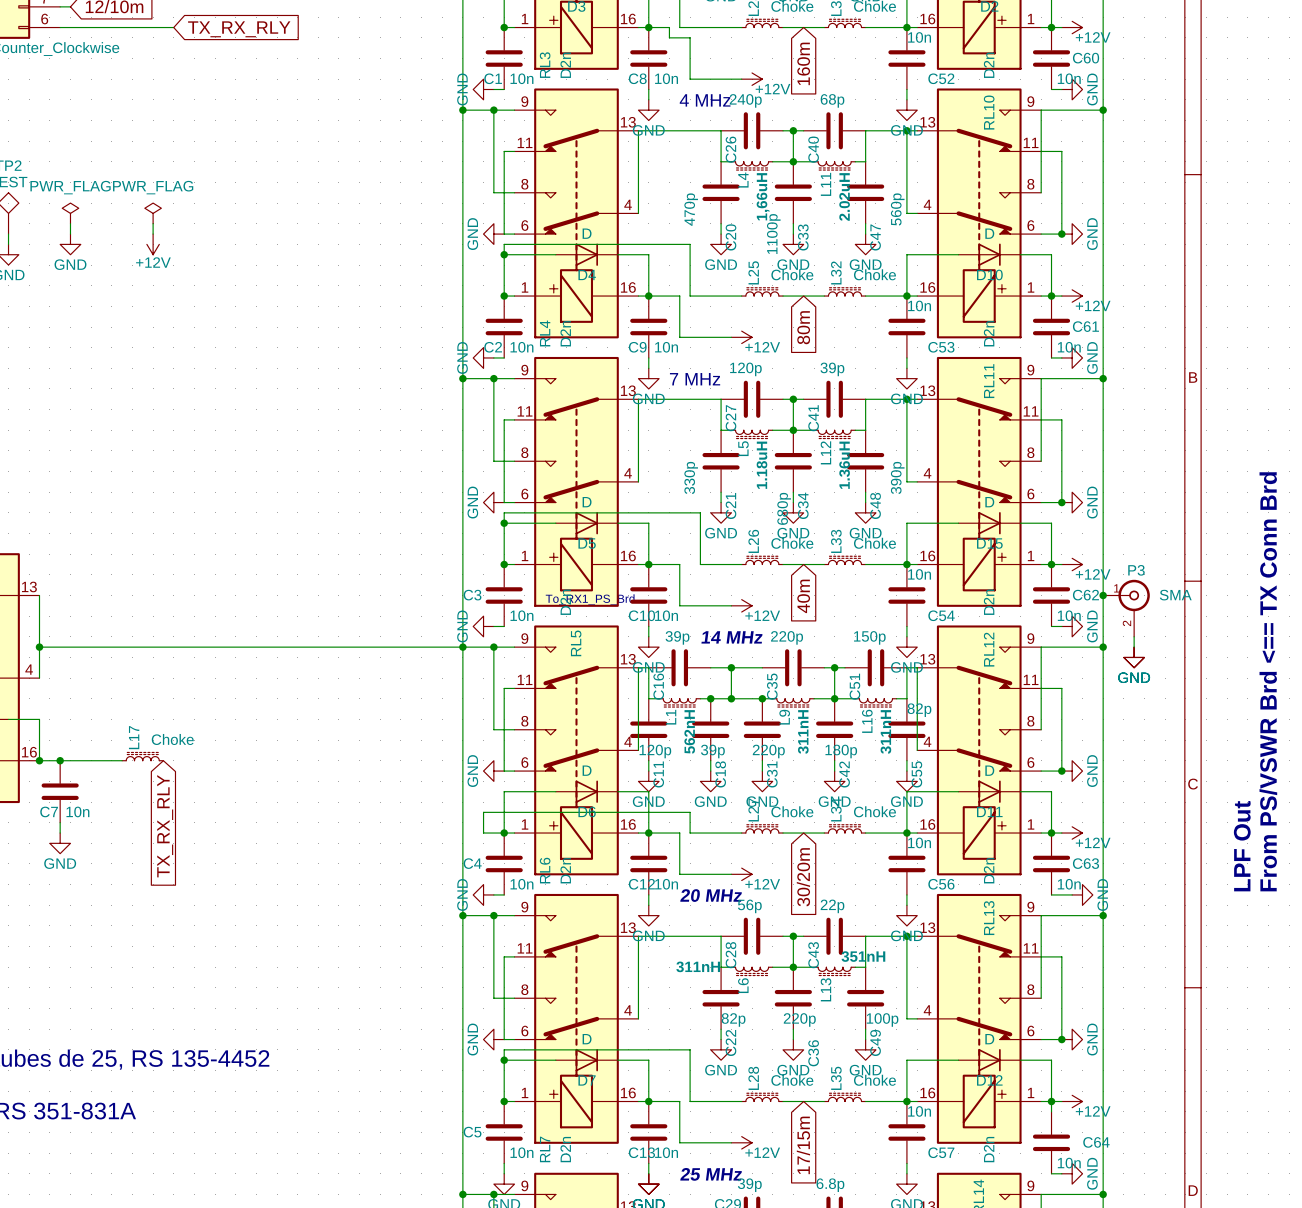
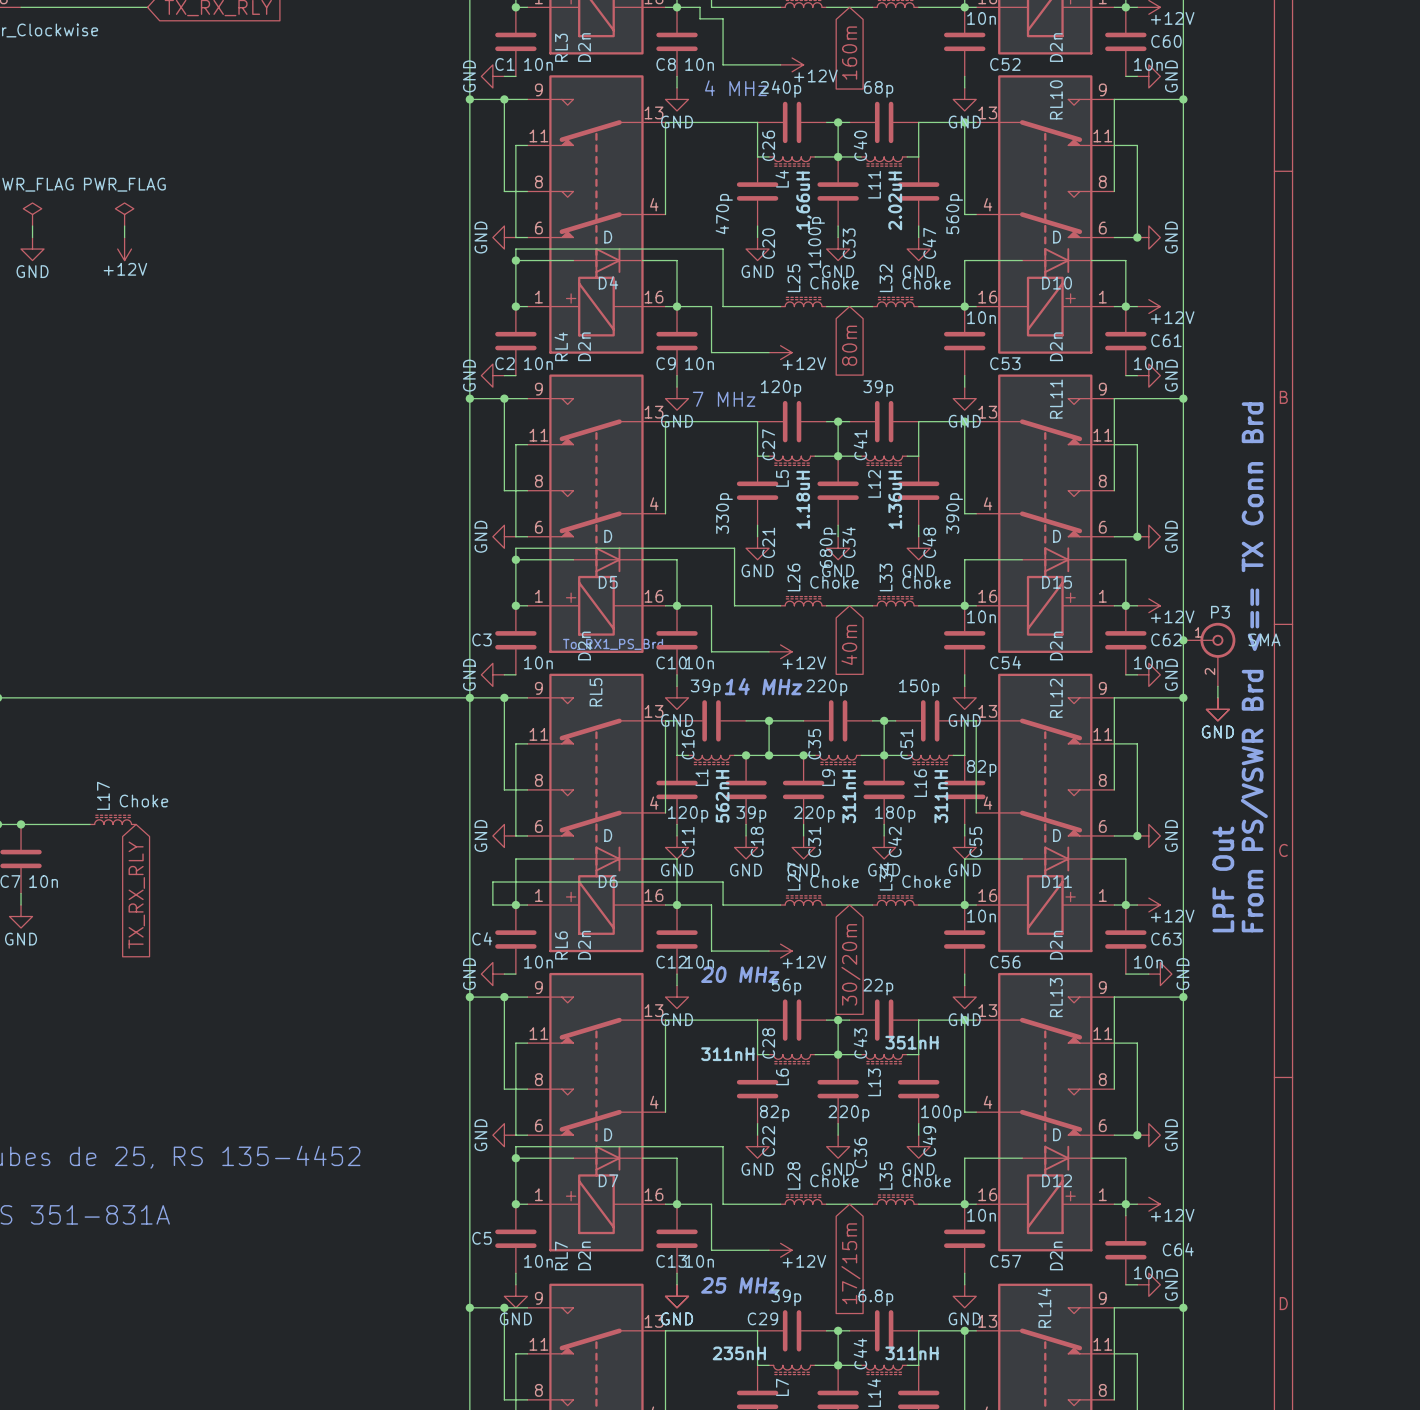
text position: From PS/VSWR Brd <== TX Conn Brd (1268, 681) -> From PS/VSWR Brd <== TX Conn Brd (1254, 667)
text position: LPF Out (1242, 846) -> LPF Out (1223, 879)

